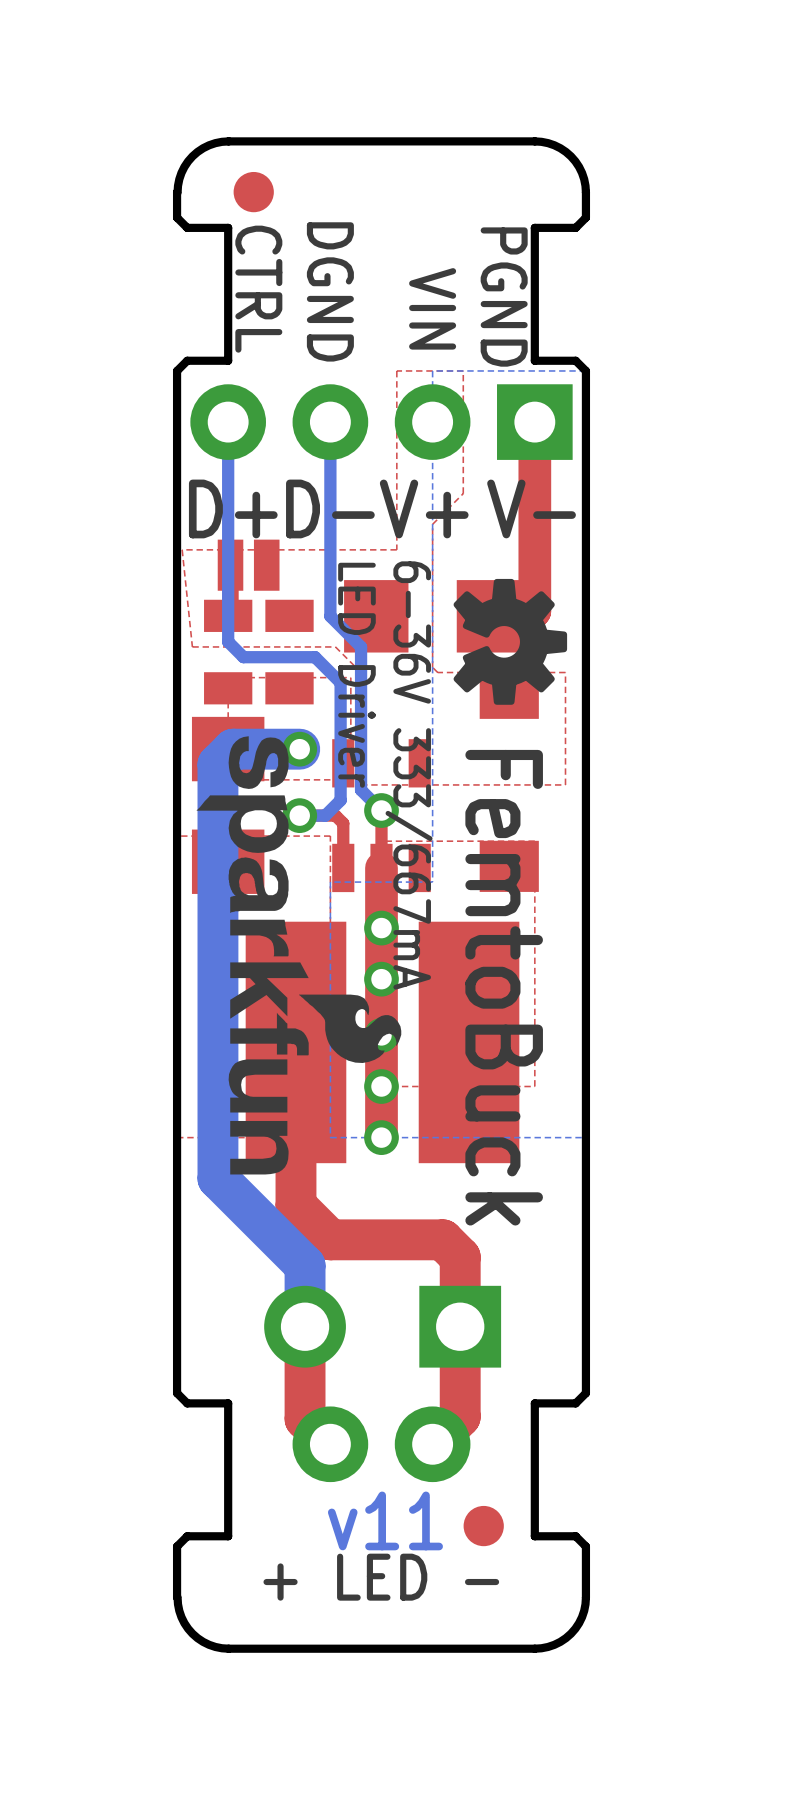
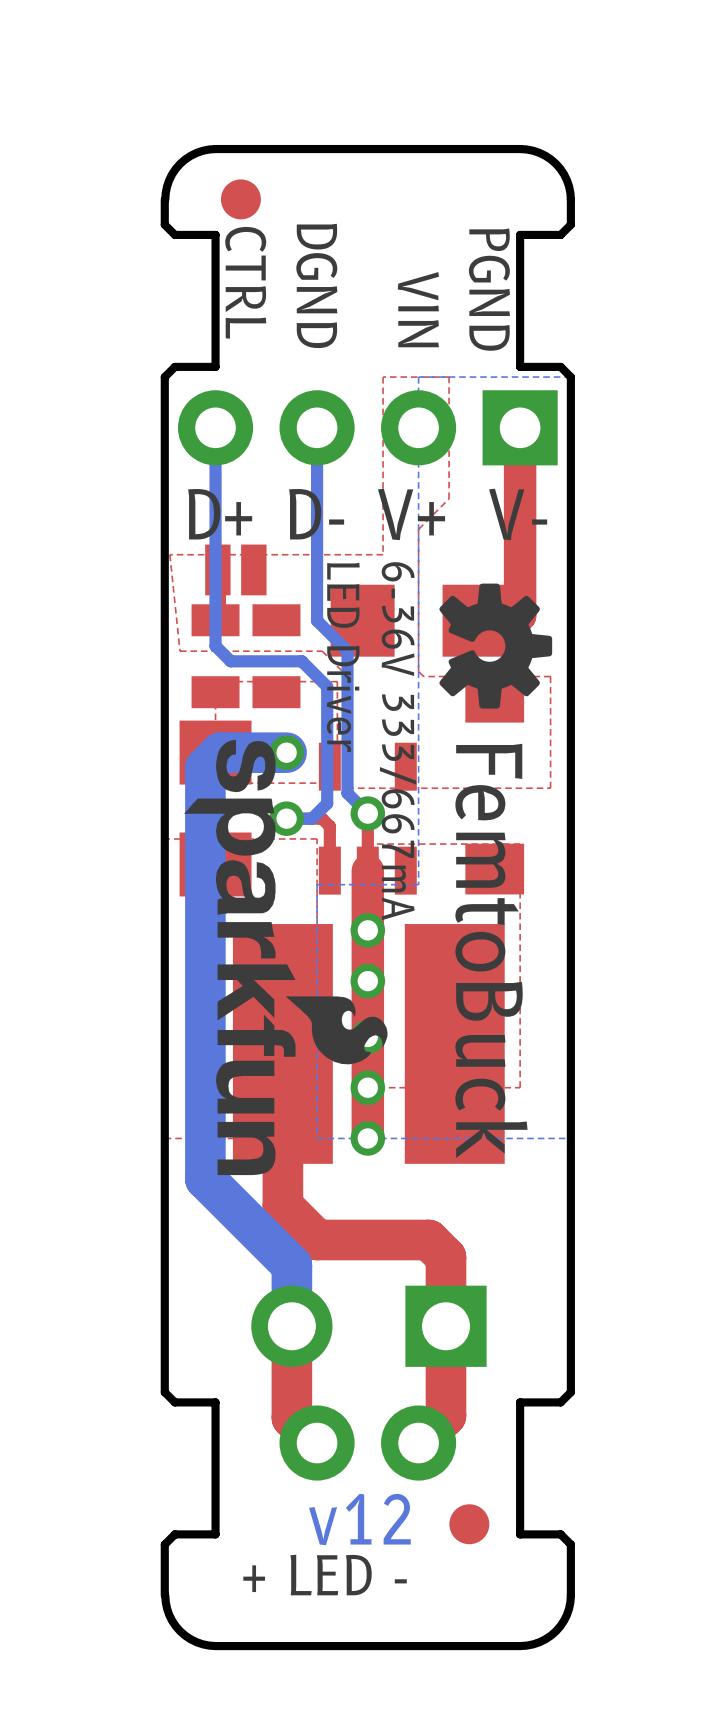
text: v11 (385, 1520) -> v12 (359, 1519)

